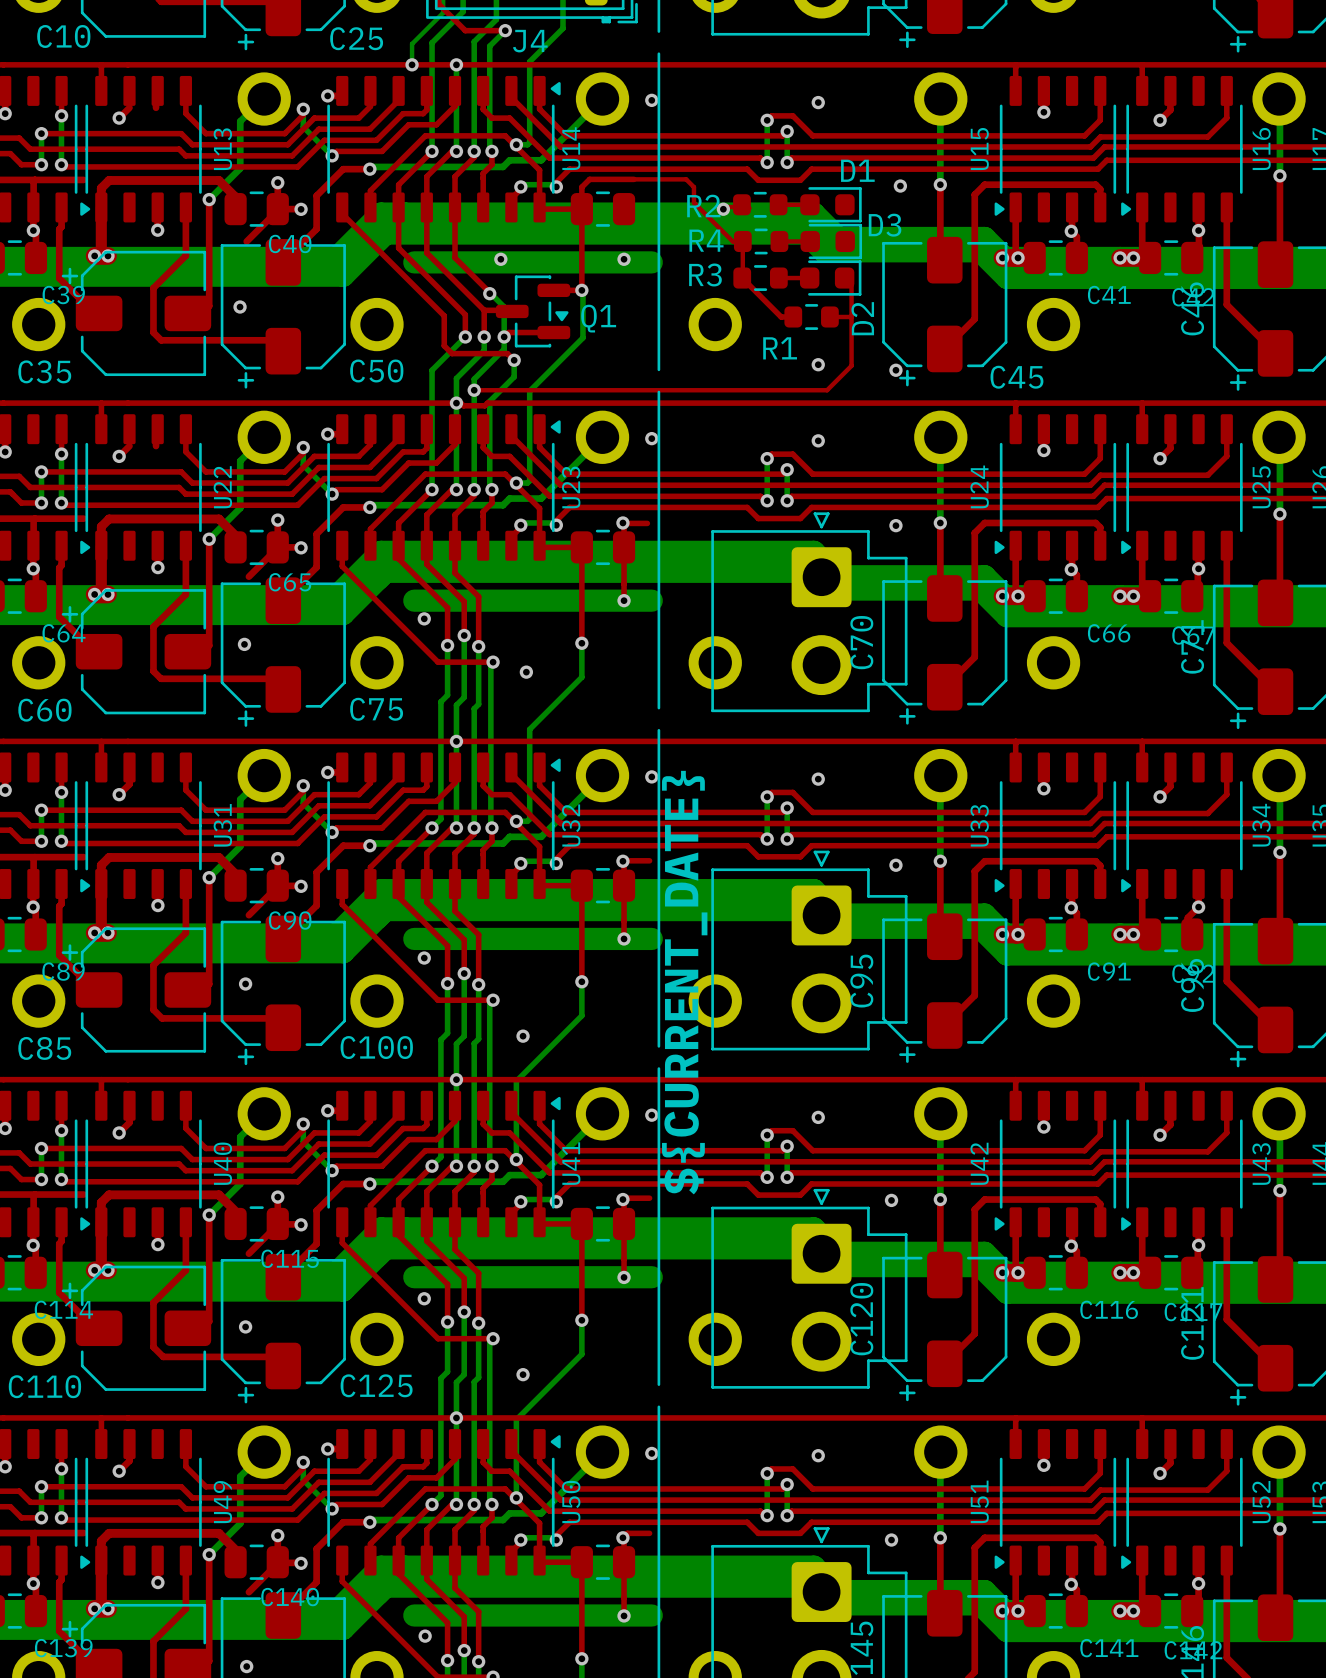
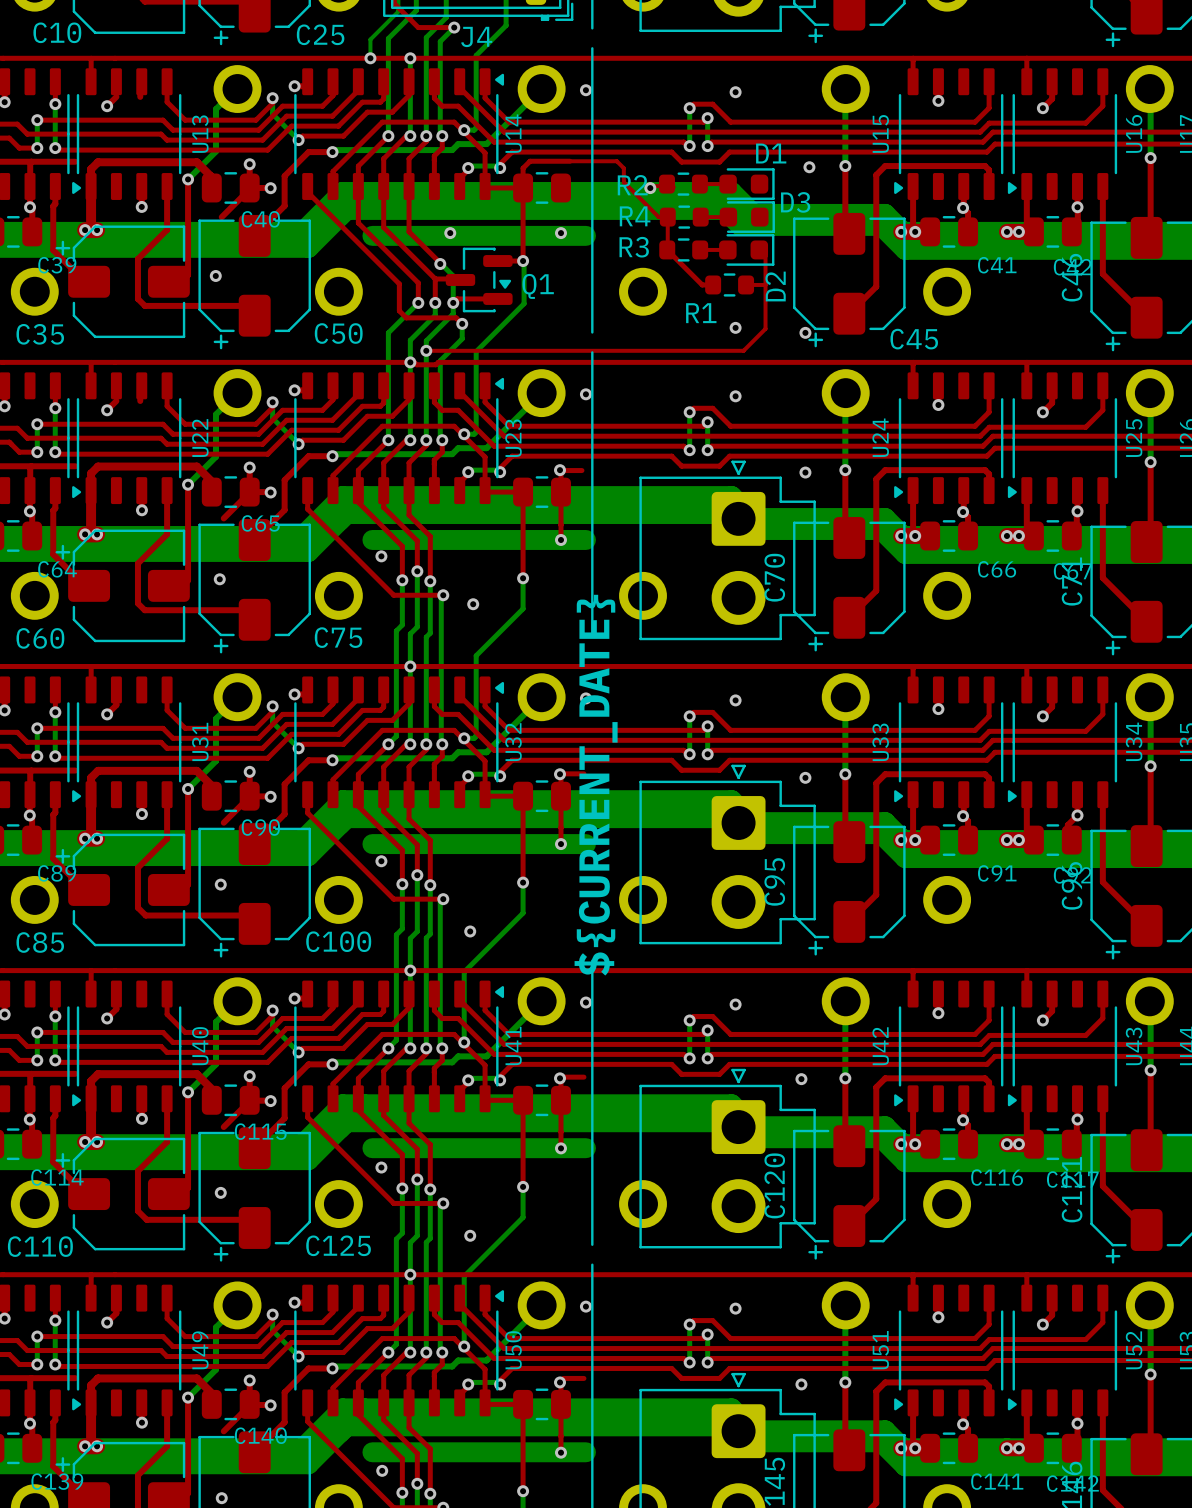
line: (658, 730) (658, 1046) -> none
text position: ${CURRENT_DATE} (683, 982) -> ${CURRENT_DATE} (596, 785)

